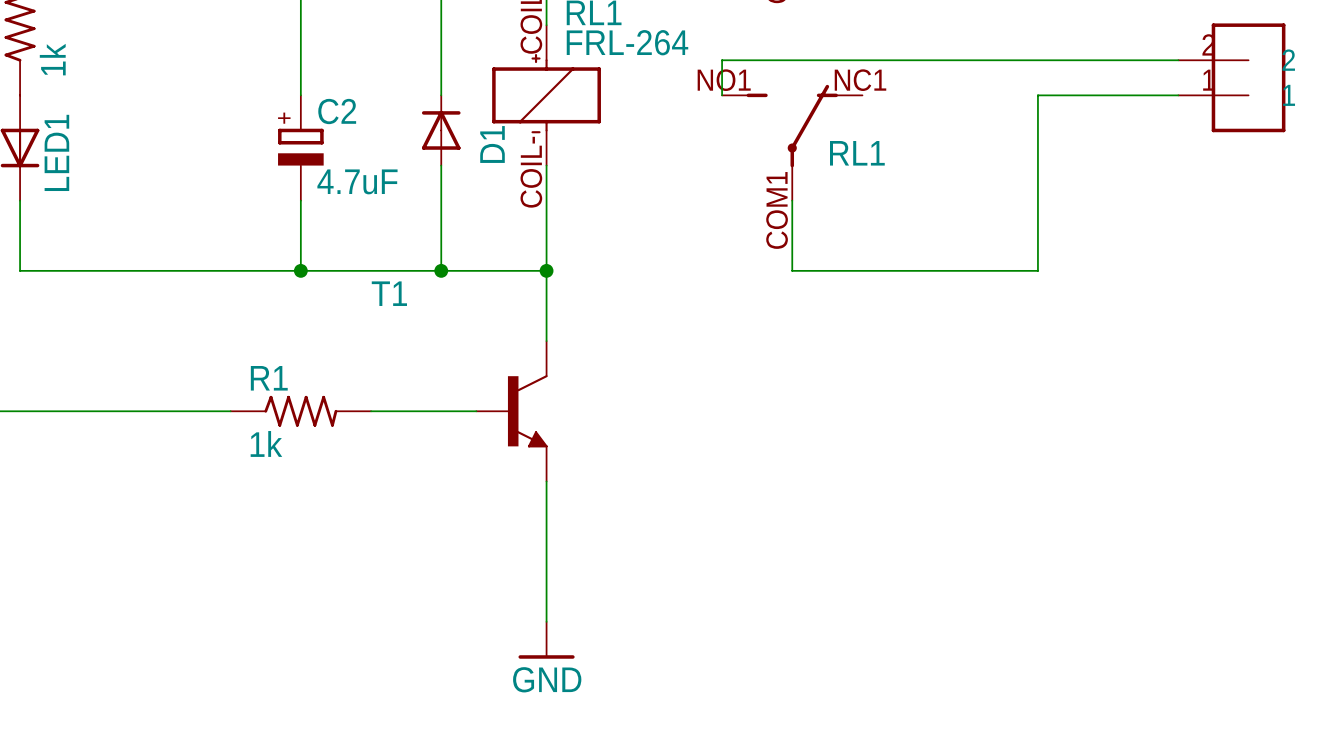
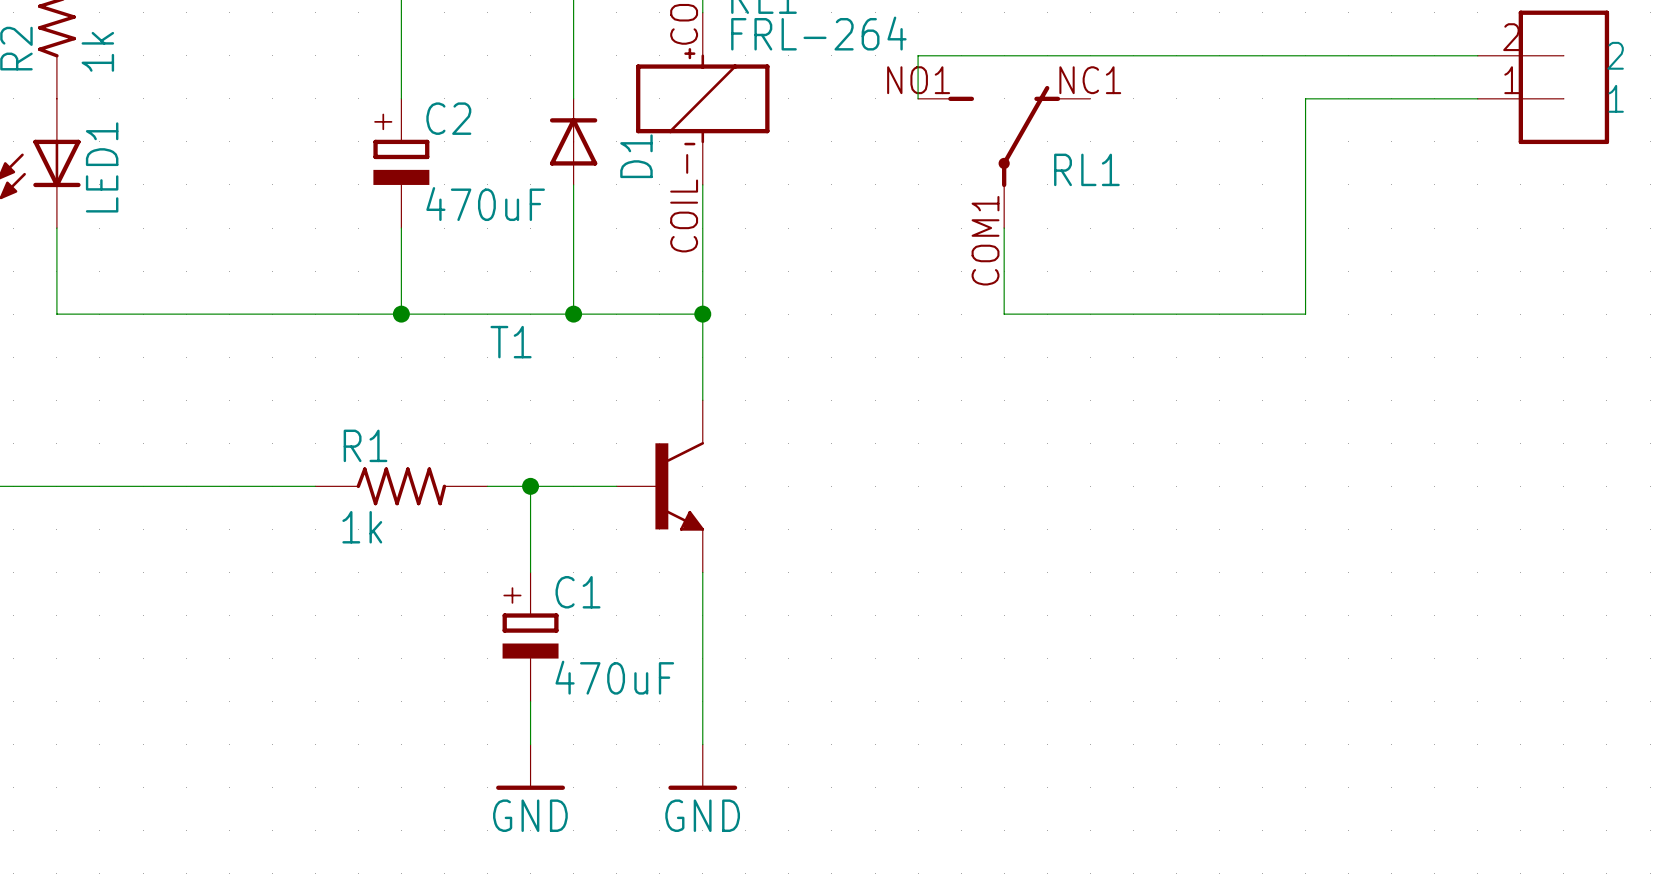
C2 value: 4.7uF (357, 181) -> 470uF (485, 204)
wire: none -> (530, 486) (530, 572)
junction: none -> (530, 486)
C1: none -> 470uF (530, 637)
wire: none -> (530, 701) (530, 744)
power symbol: none -> GND (530, 767)

